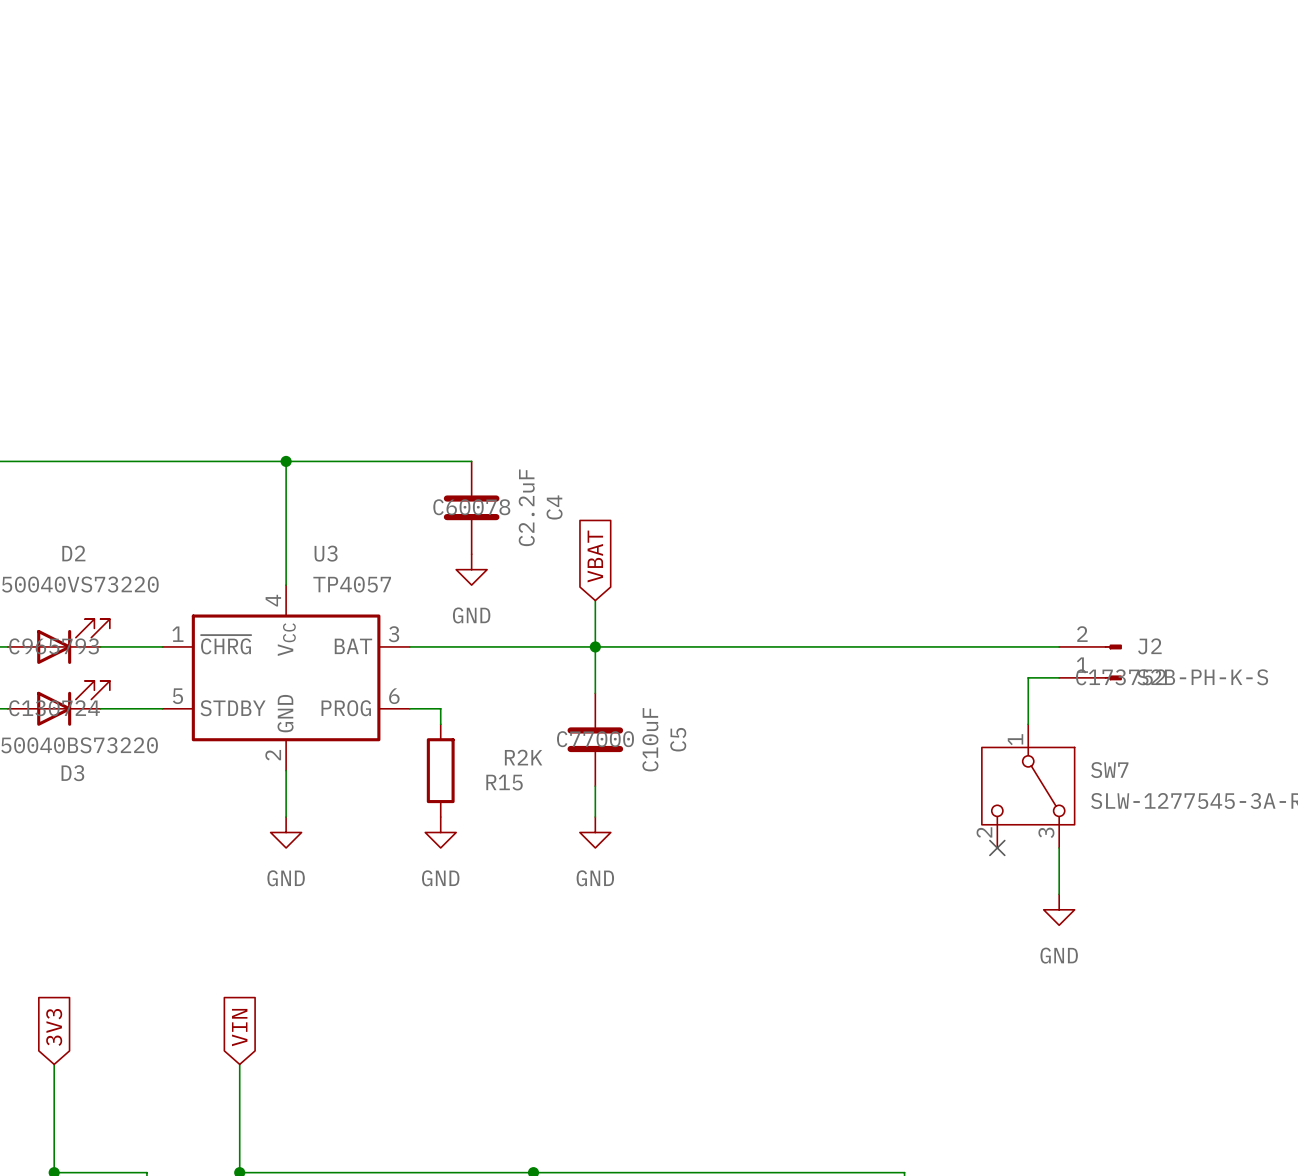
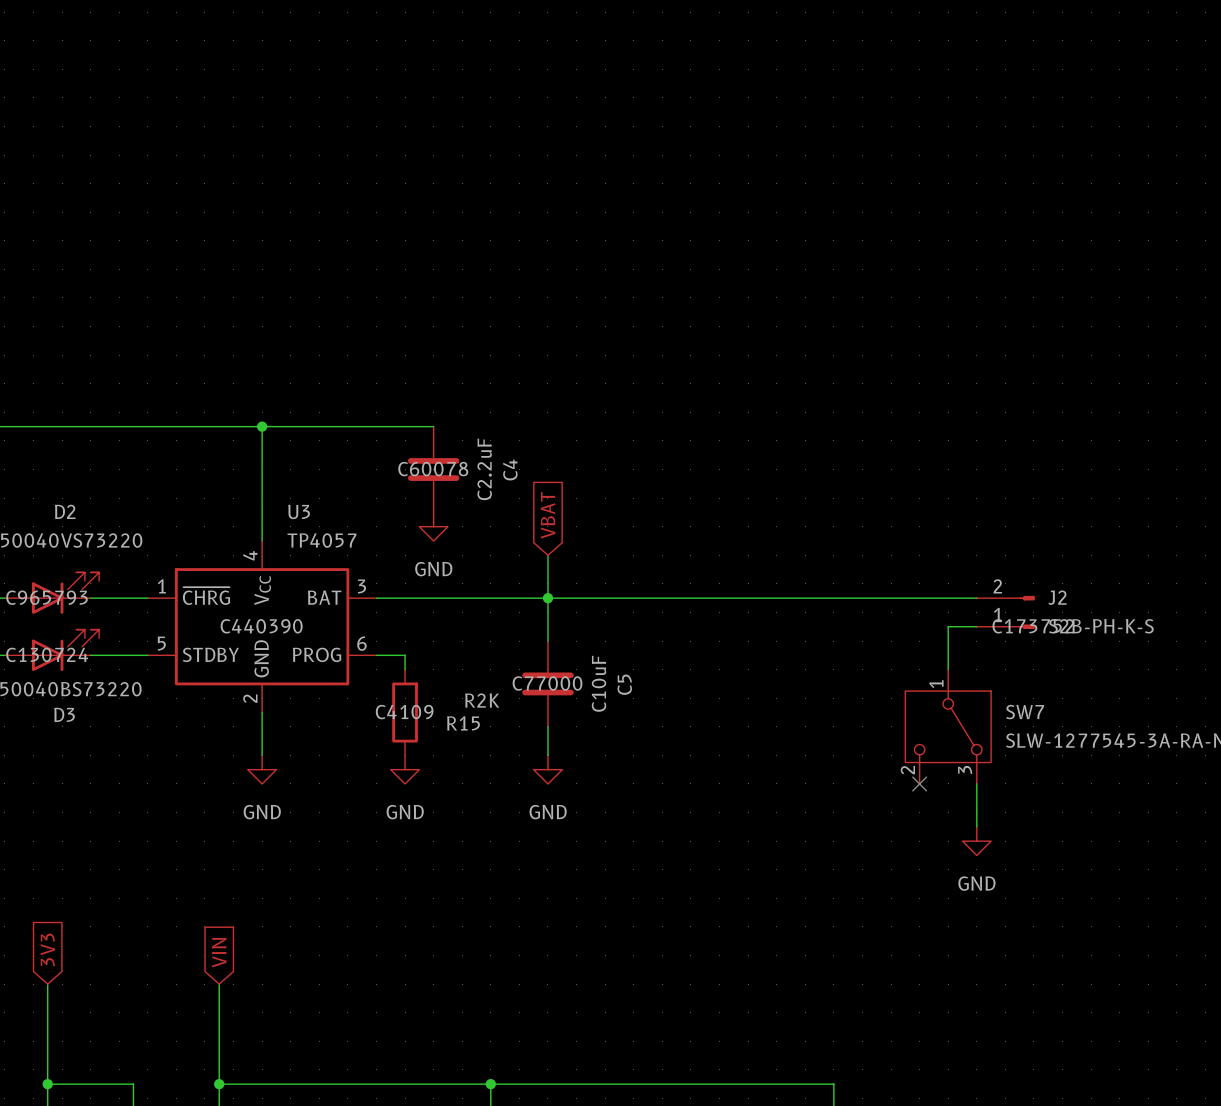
U3 text: none -> C440390 (261, 626)
R15 text: none -> C4109 (404, 712)

